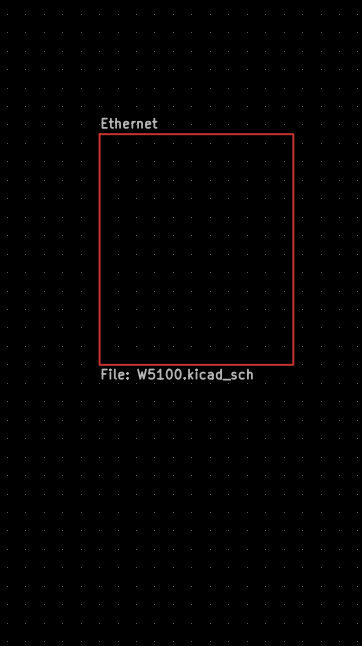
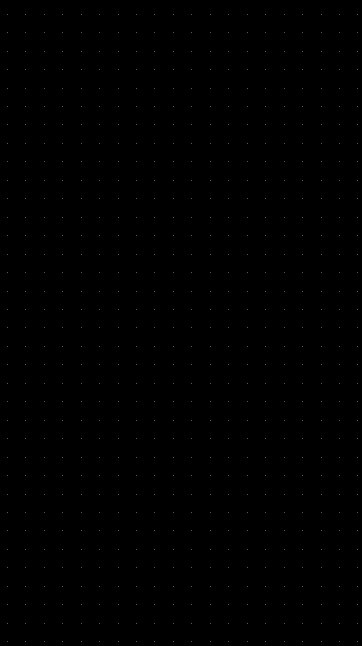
sheet Ethernet: File: W5100.kicad_sch (196, 249) -> none

